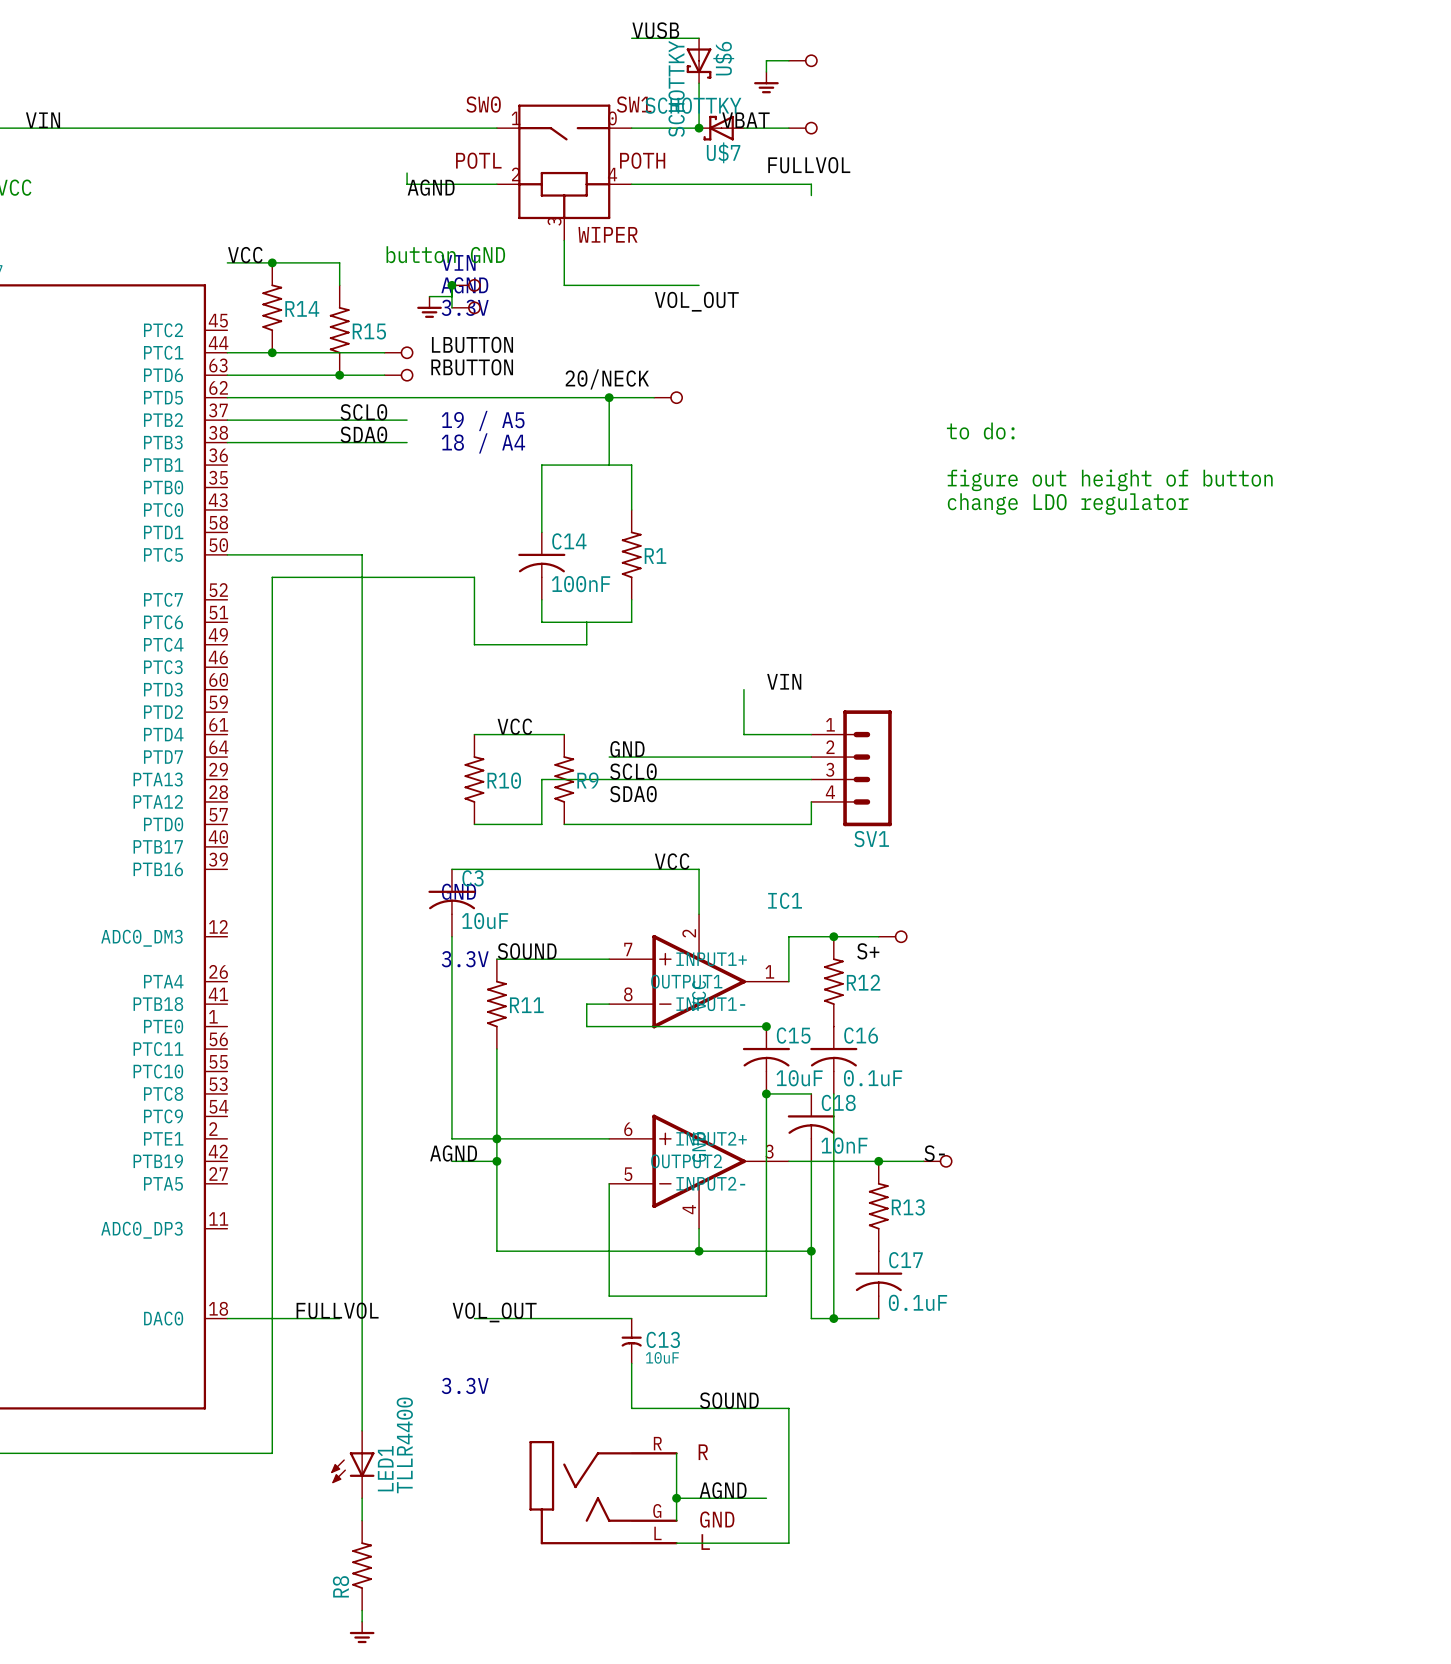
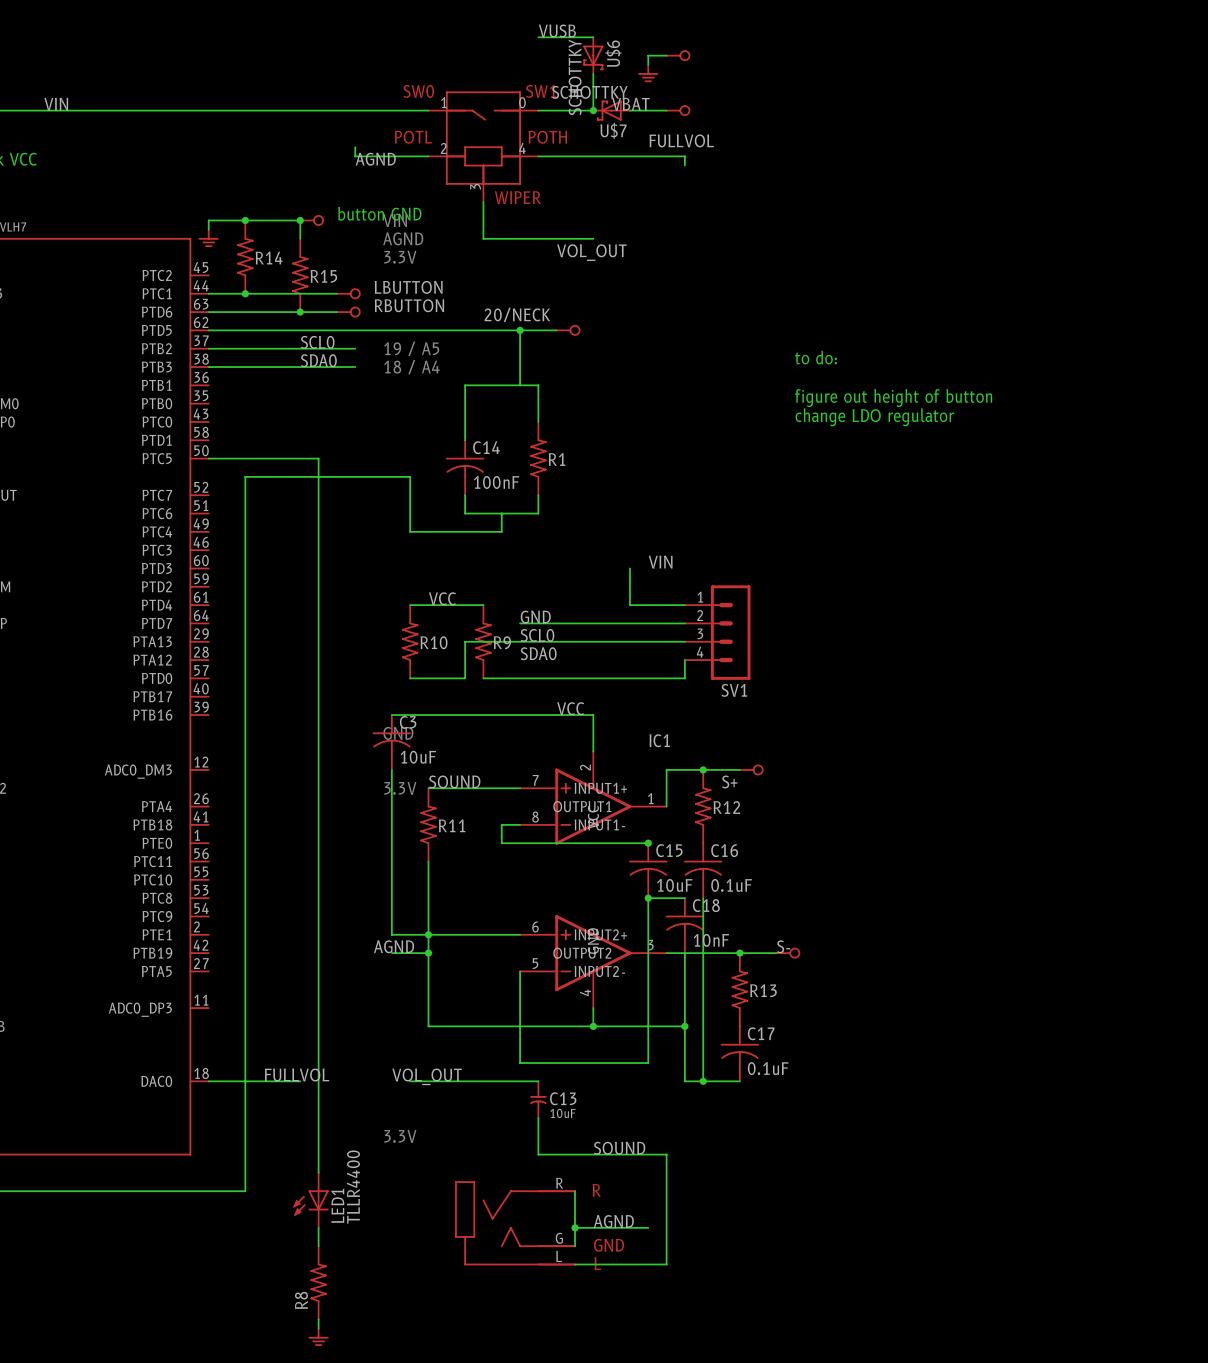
label: VCC (245, 255) -> none
wire: none -> (208, 220) (208, 229)
junction: none -> (300, 220)
part: none -> (311, 220)
wire: (451, 285) (451, 307) -> none
junction: (451, 285) -> none
part: (466, 285) -> none
wire: (429, 296) (451, 296) -> none
power symbol position: (429, 306) -> (208, 238)
part: (466, 307) -> none

